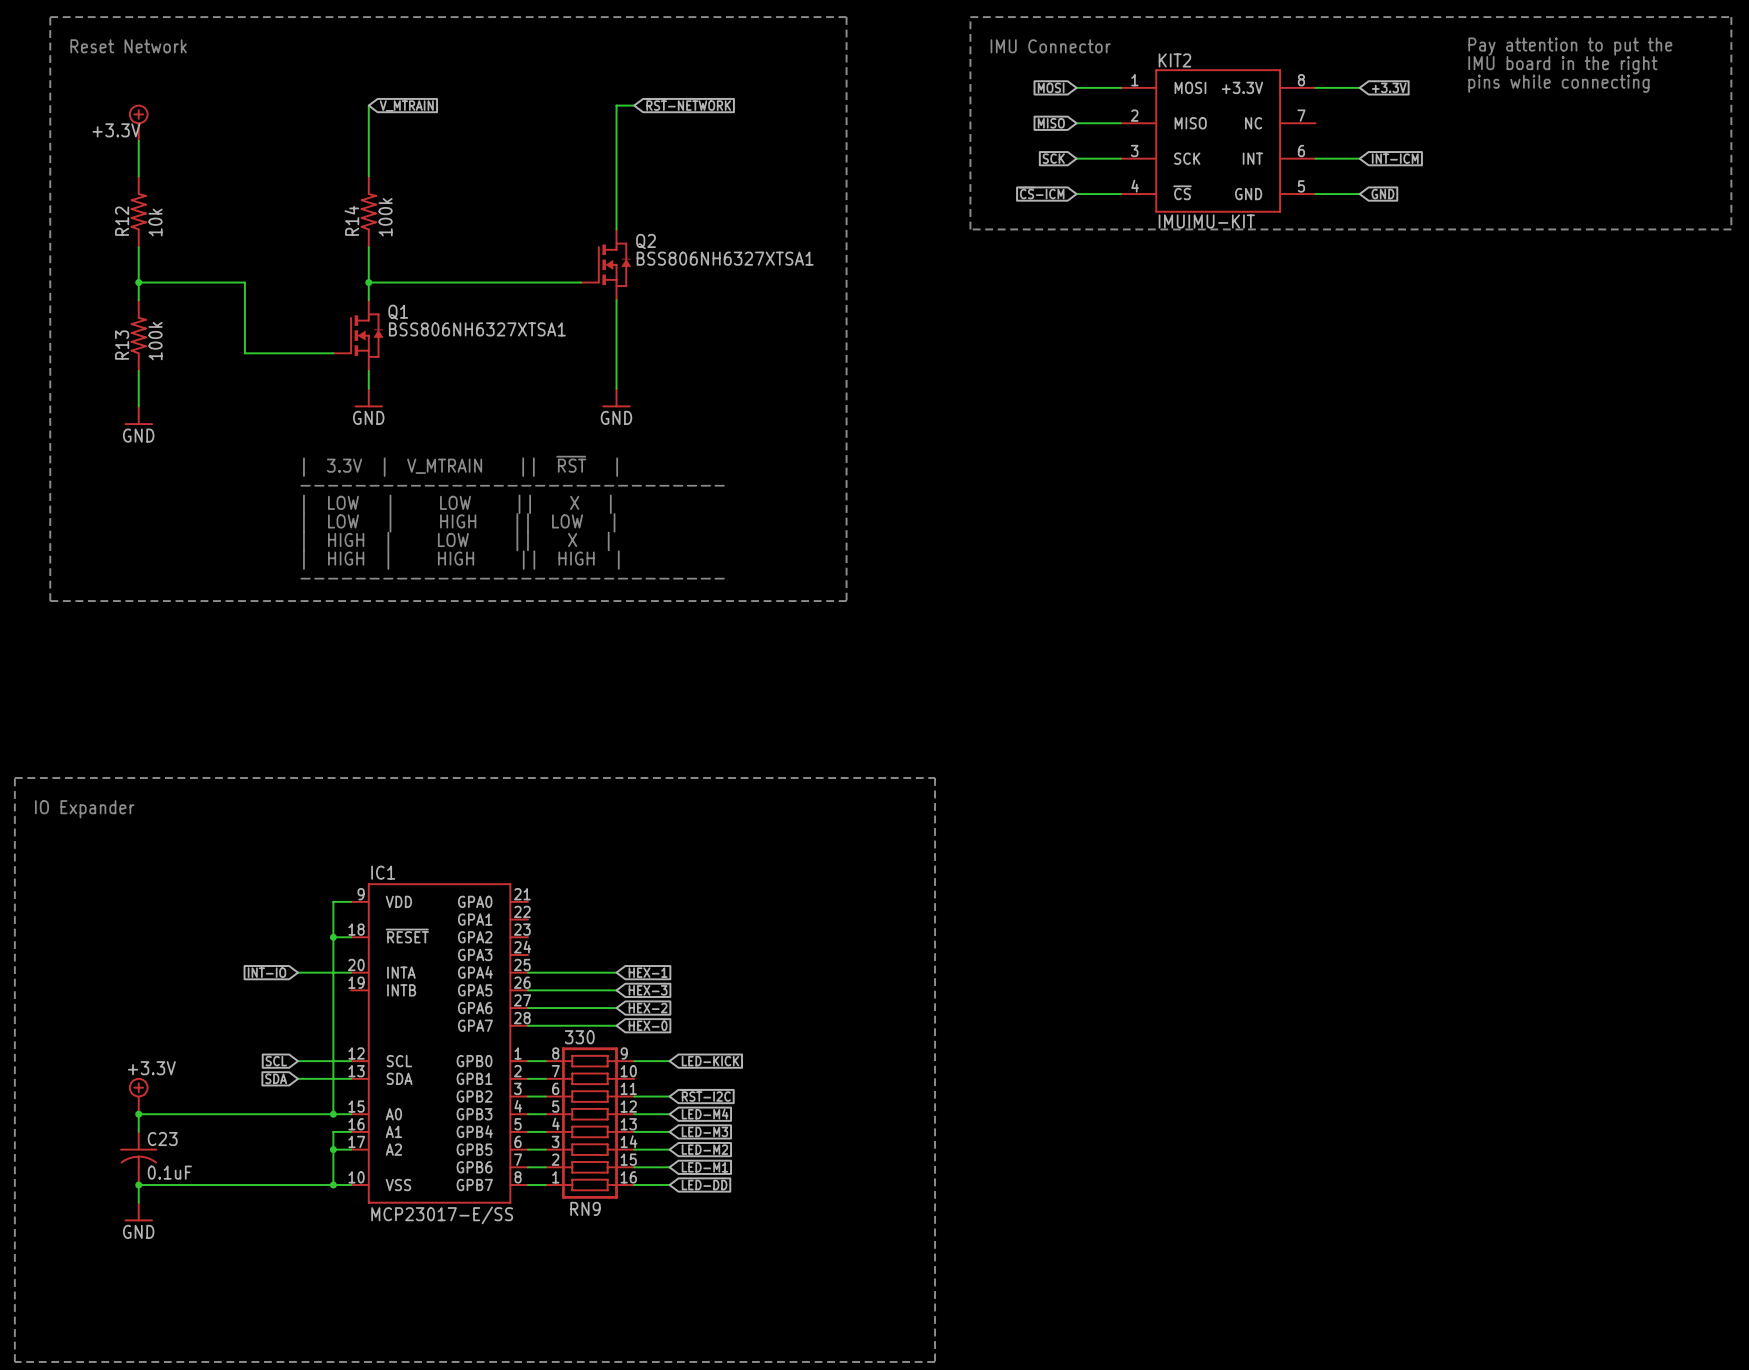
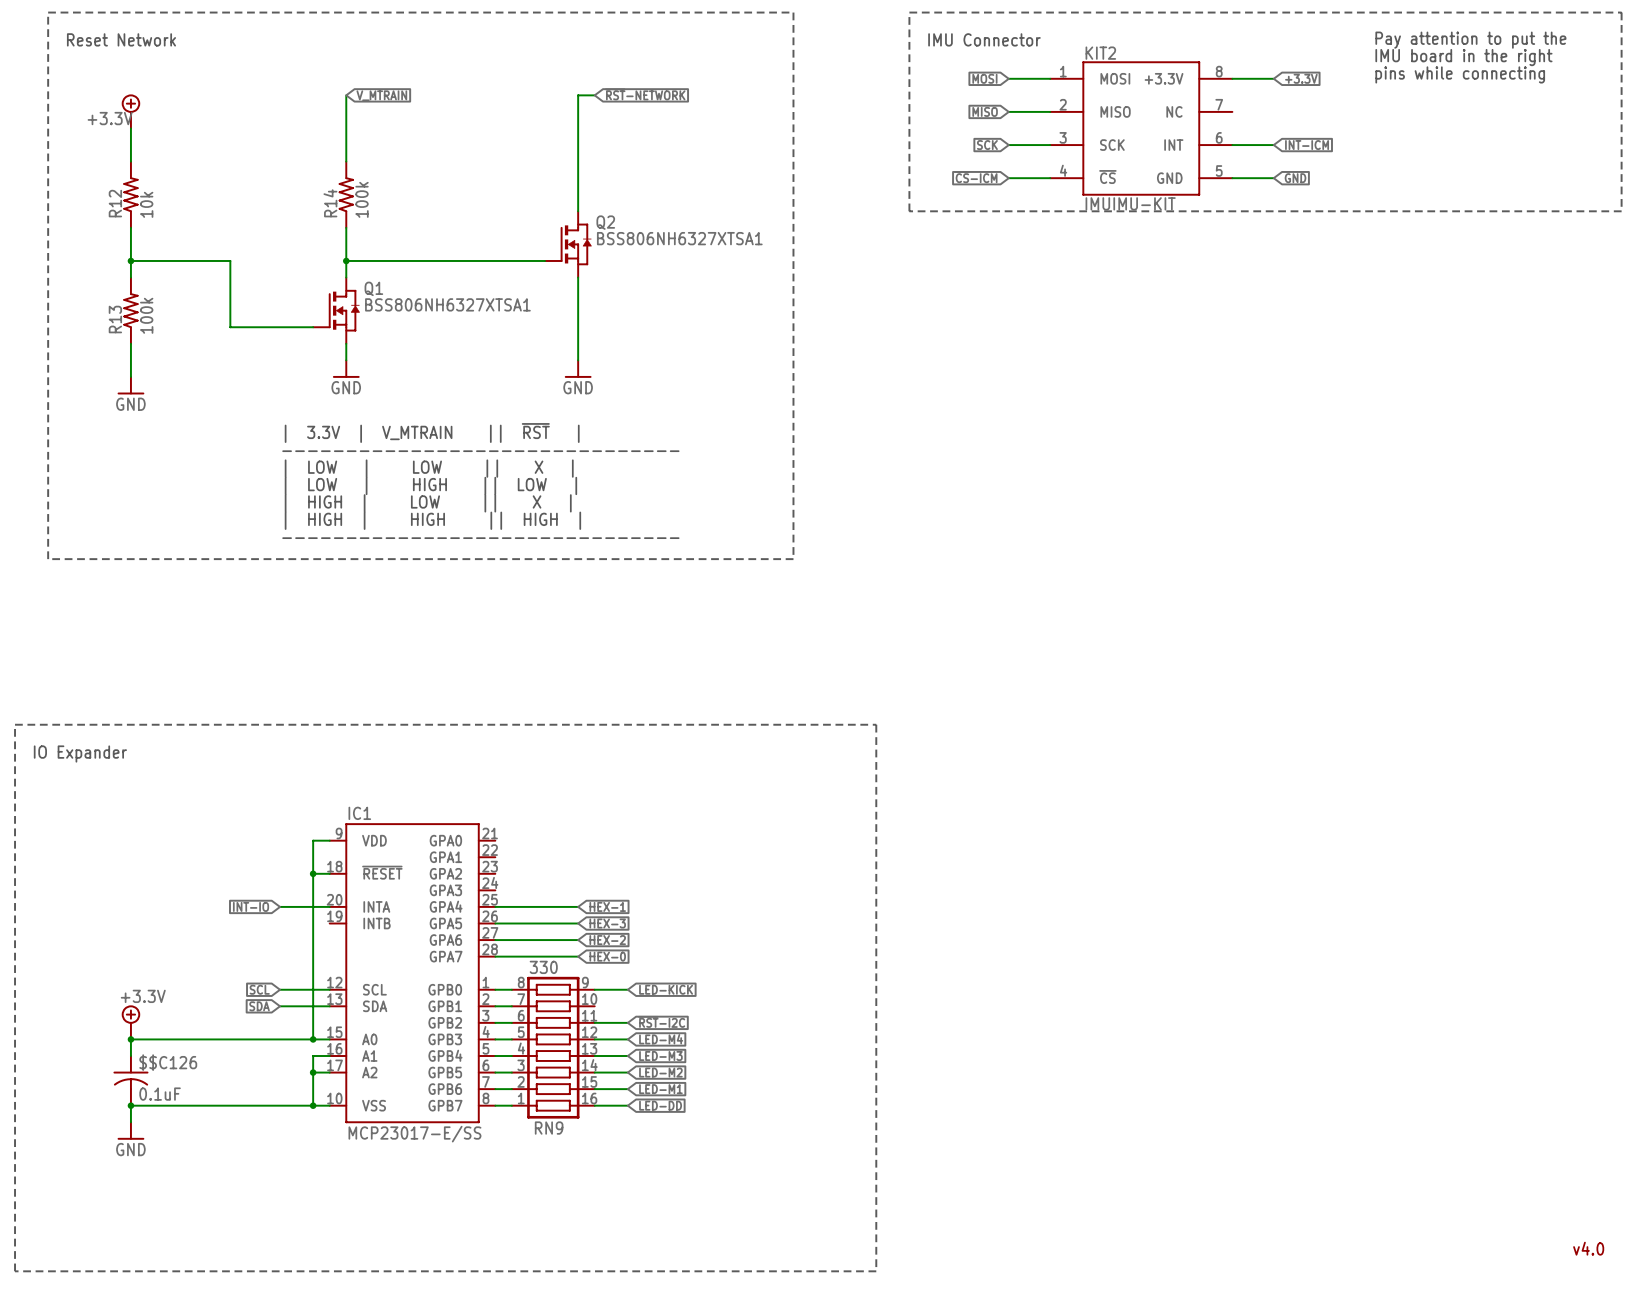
C23 name: C23 (162, 1139) -> $$C126 (168, 1062)
text: none -> v4.0 (1588, 1248)

